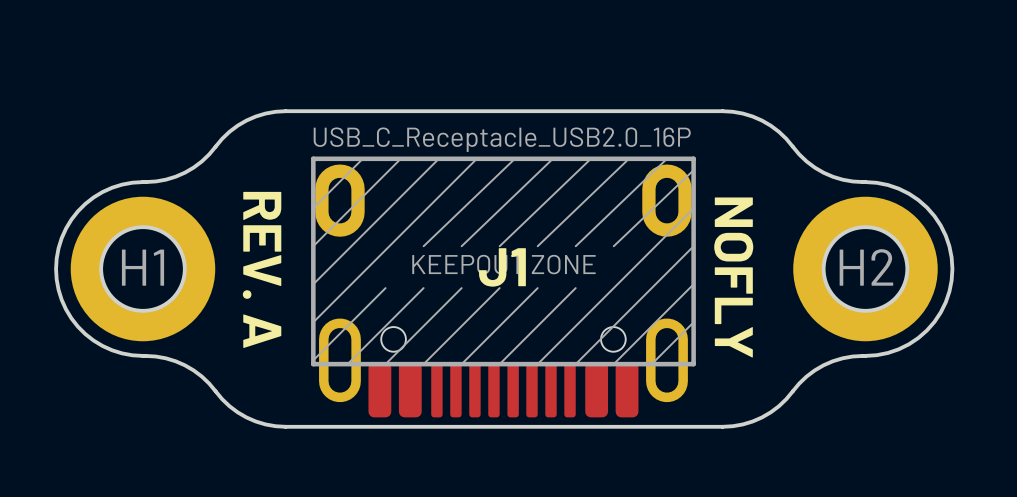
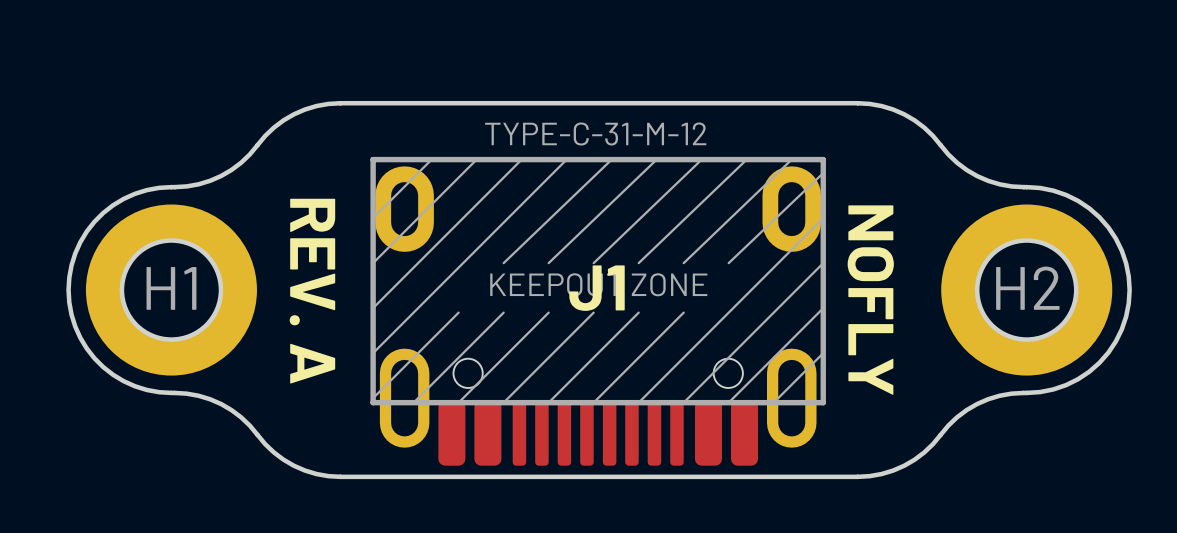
J1 value: USB_C_Receptacle_USB2.0_16P (502, 139) -> TYPE-C-31-M-12 (595, 134)

